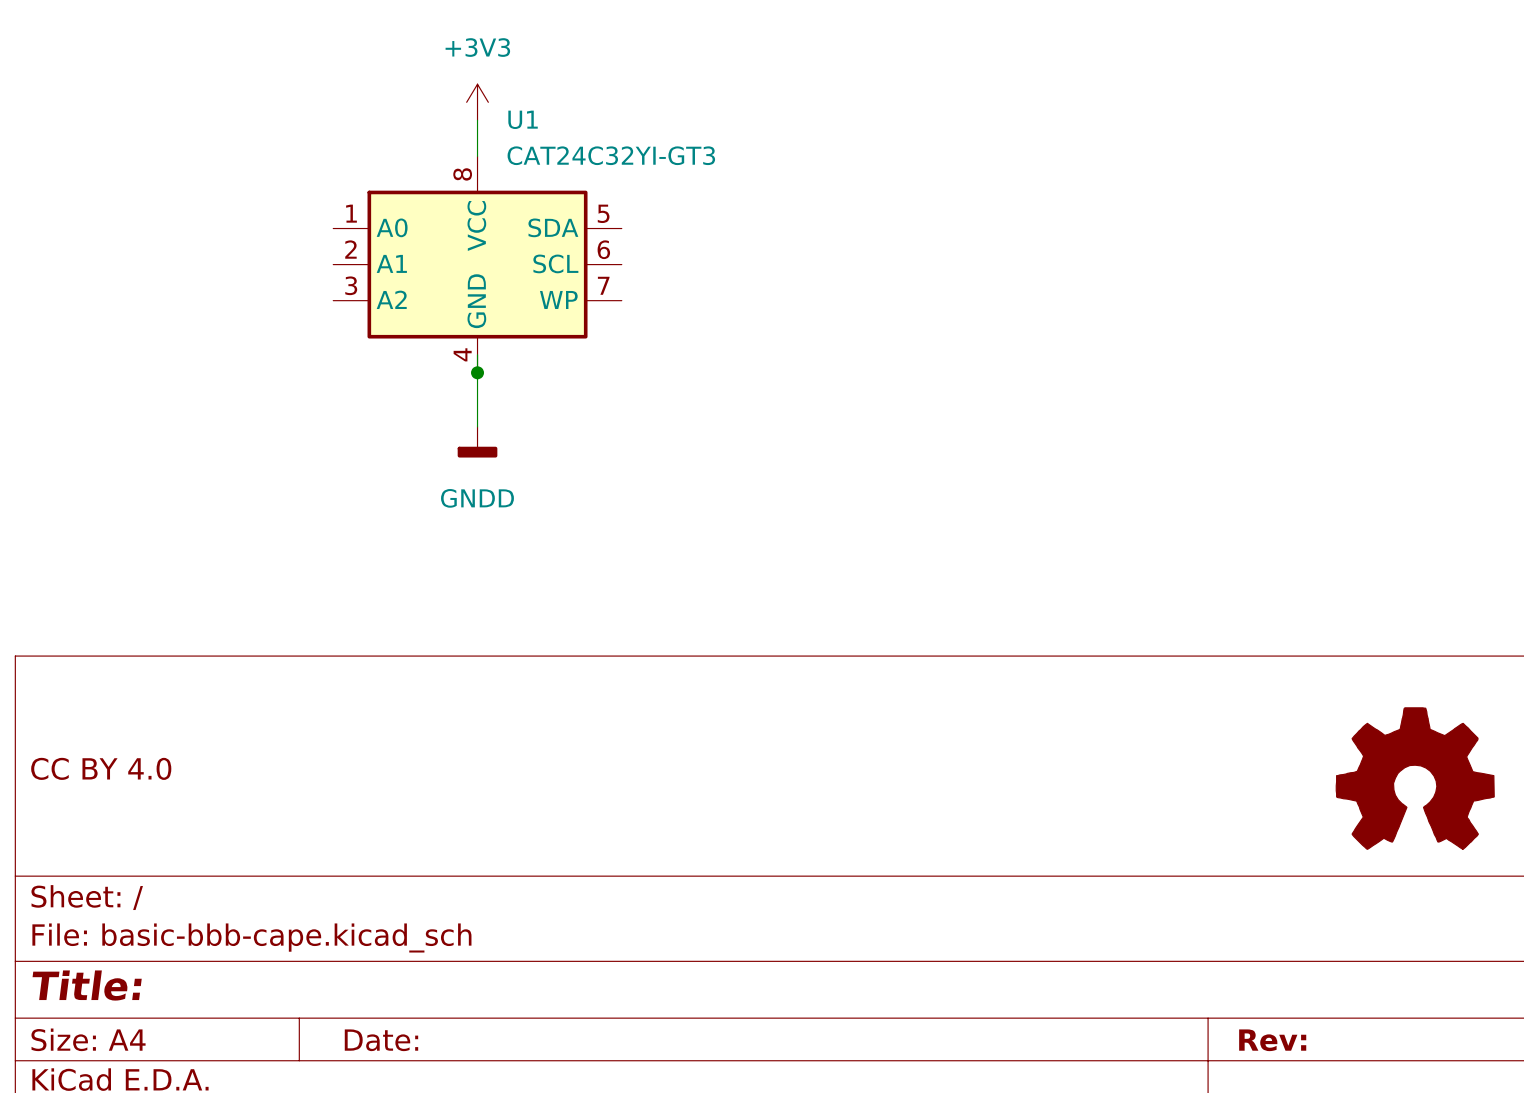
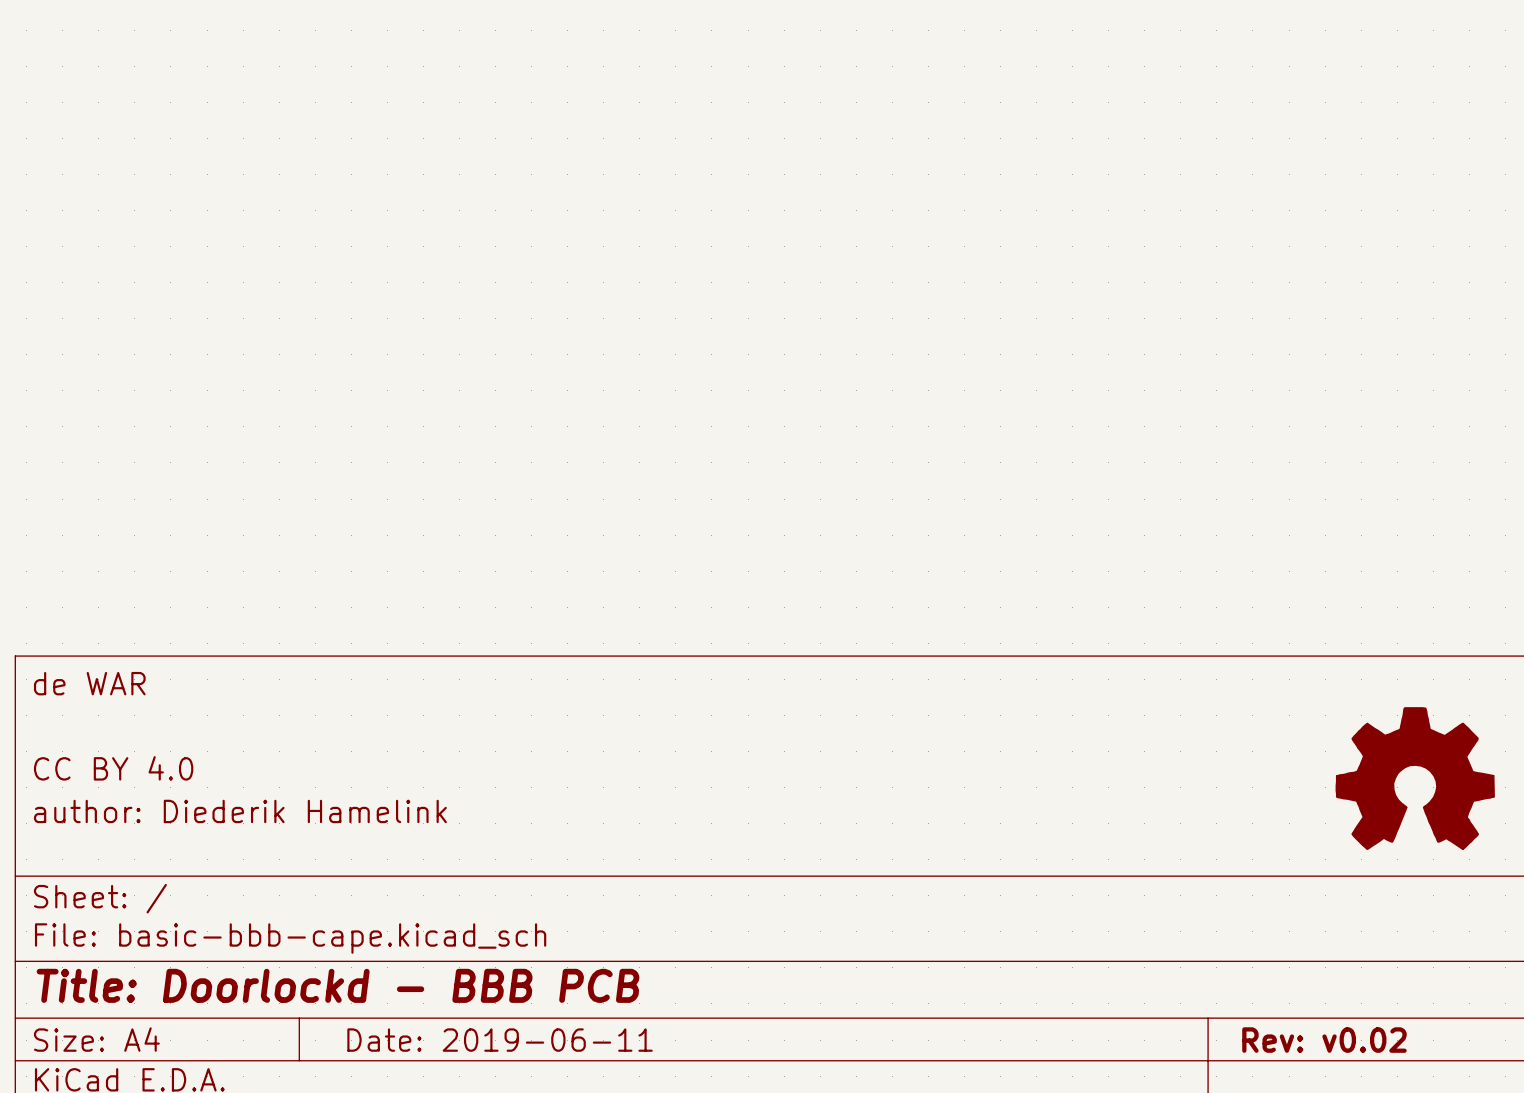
power symbol: +3V3 (477, 102) -> none
wire: (477, 120) (477, 156) -> none
U1: CAT24C32YI-GT3 (477, 264) -> none
wire: (477, 354) (477, 426) -> none
junction: (477, 372) -> none
power symbol: GNDD (477, 442) -> none
title block: none -> de WAR (89, 683)
title block: none -> author: Diederik Hamelink (240, 811)
title block: Title: (87, 985) -> Title: Doorlockd - BBB PCB (338, 985)
title block: Date: (381, 1040) -> Date: 2019-06-11 (500, 1040)
title block: Rev: (1272, 1040) -> Rev: v0.02 (1324, 1040)

